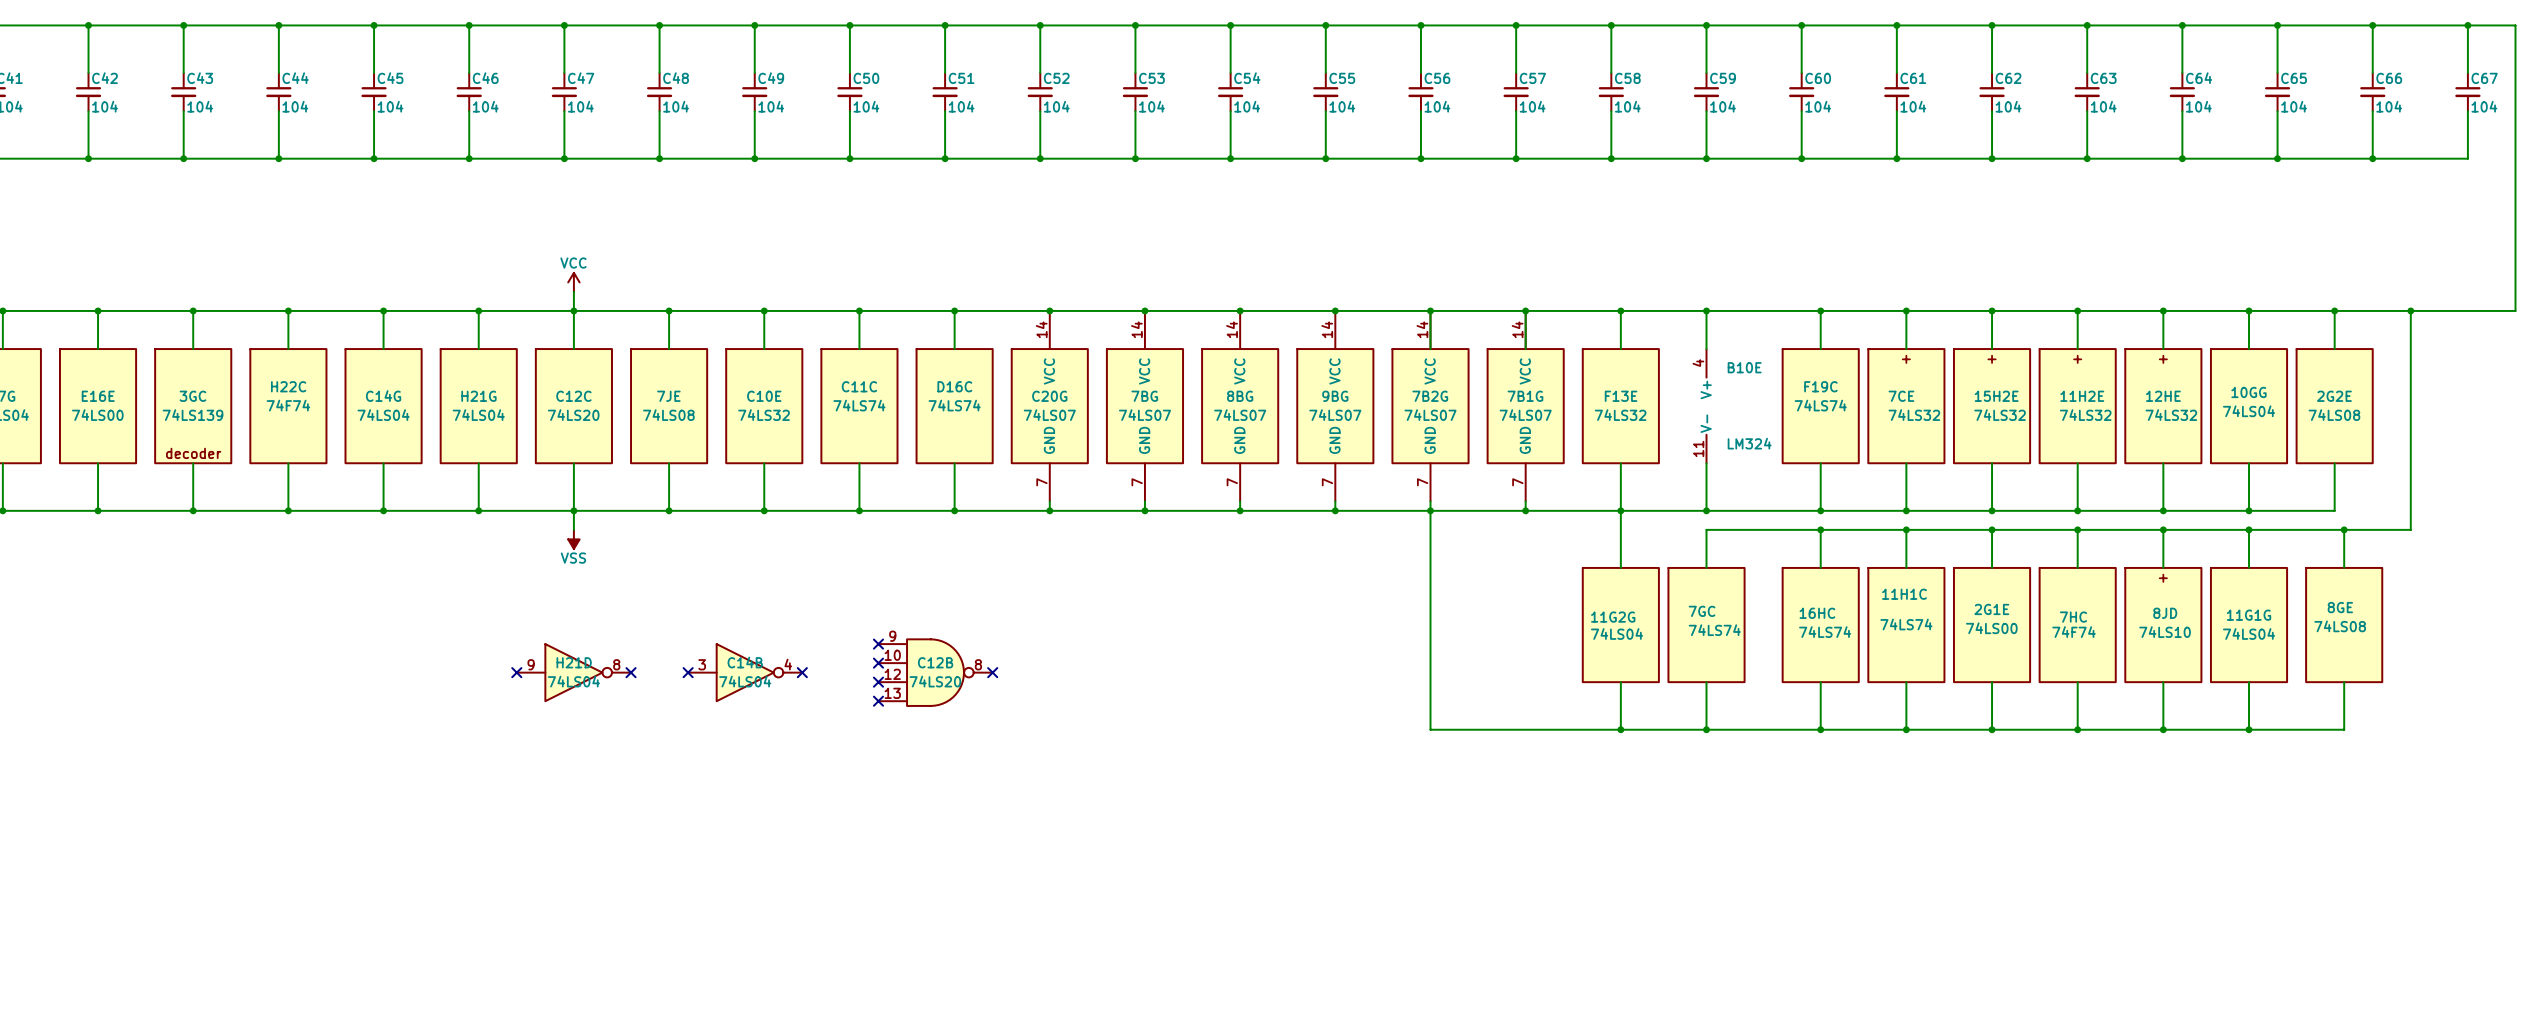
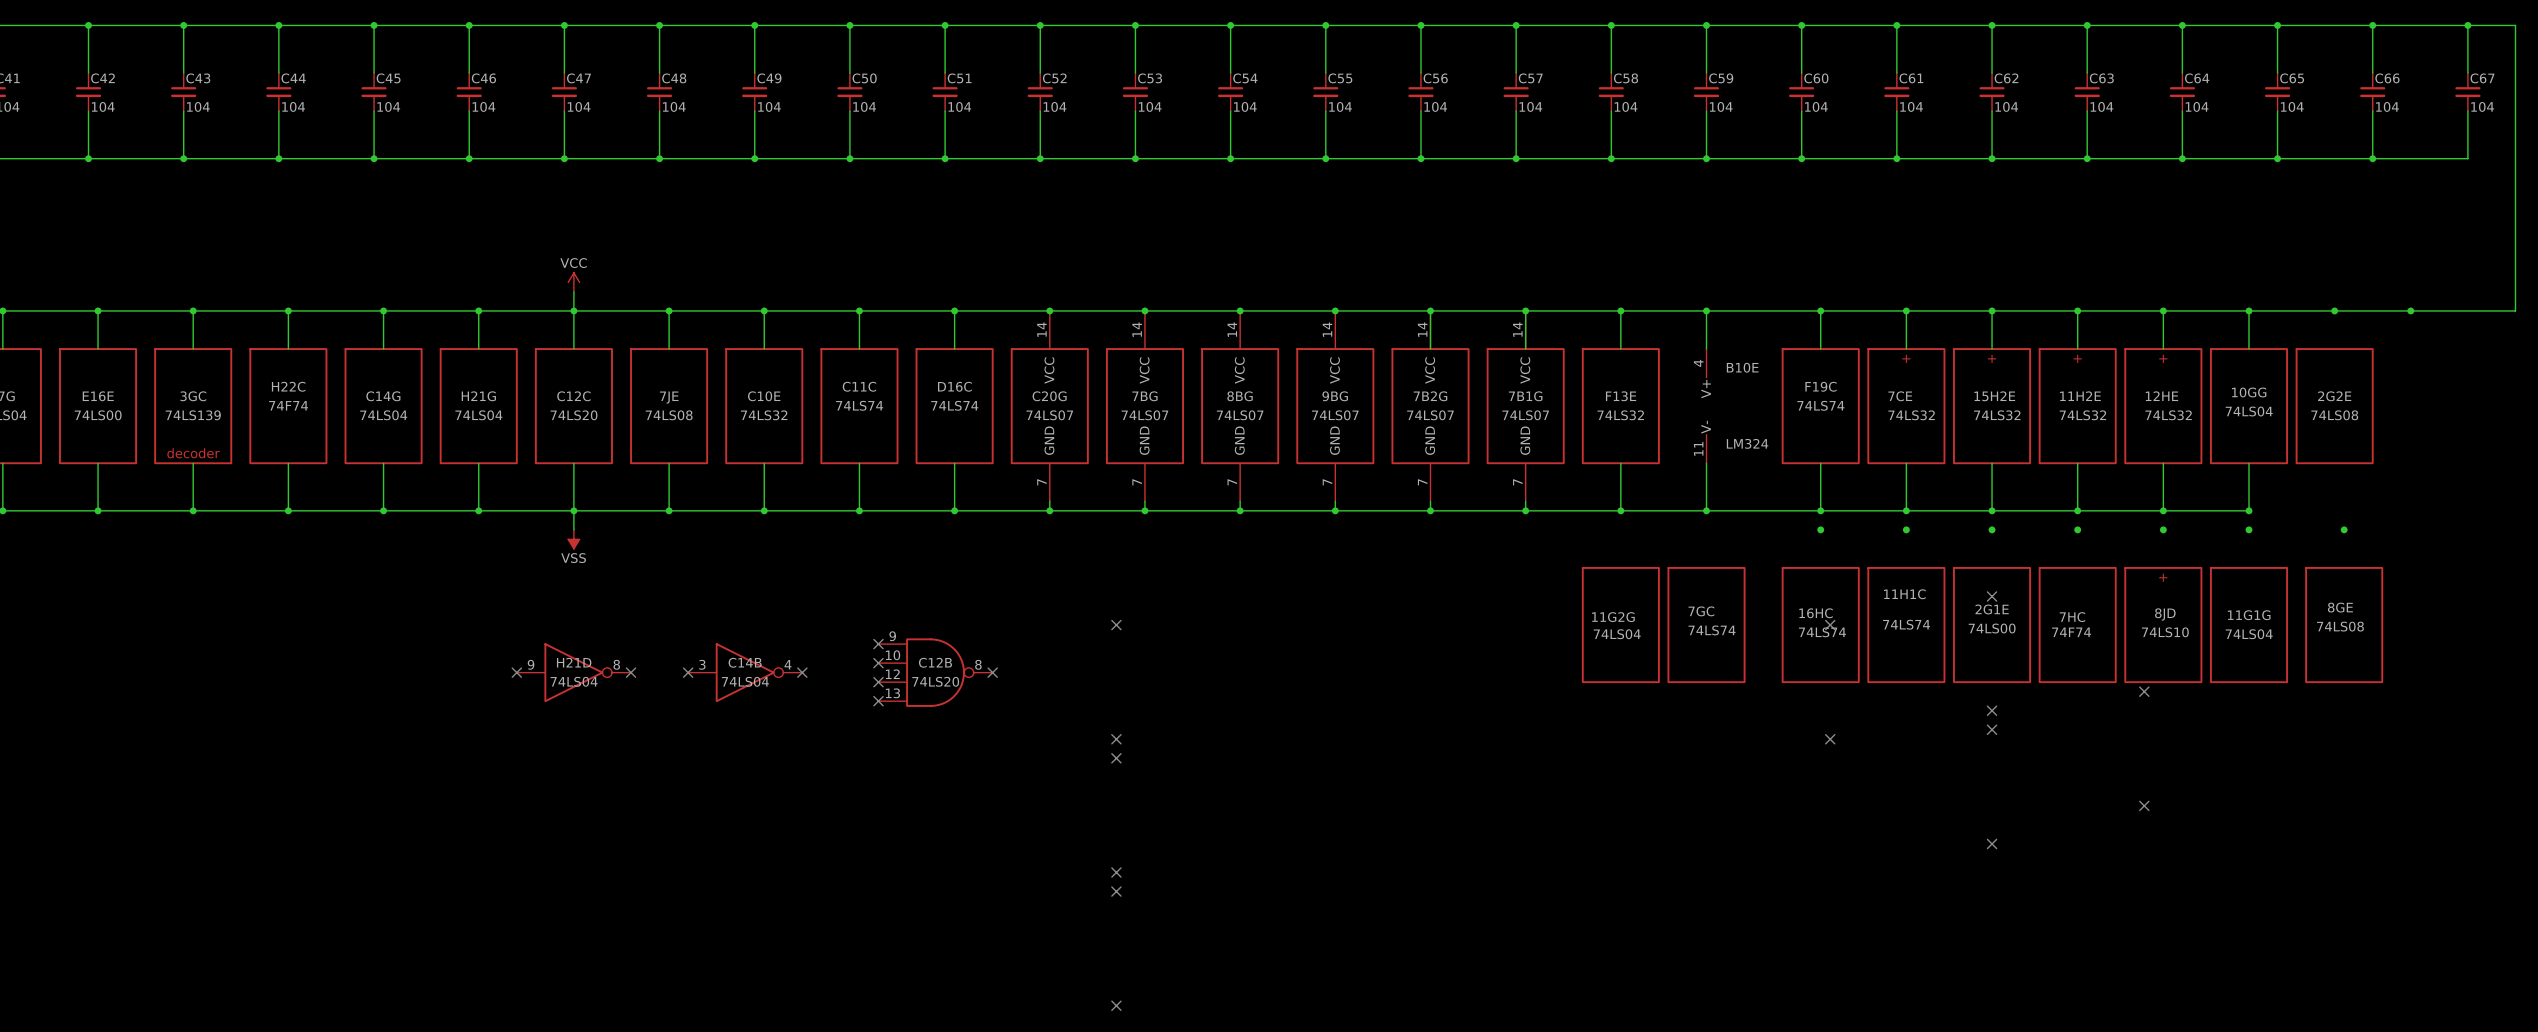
wire: (2334, 310) (2334, 349) -> none
wire: (2410, 310) (2410, 529) (1706, 529) (1706, 567) -> none
wire: (2334, 463) (2334, 510) (2249, 510) -> none
wire: (1430, 510) (1430, 729) (2344, 729) (2344, 682) -> none
wire: (1620, 510) (1620, 567) -> none
wire: (1820, 529) (1820, 567) -> none
wire: (1906, 529) (1906, 567) -> none
wire: (1992, 529) (1992, 567) -> none
wire: (2077, 529) (2077, 567) -> none
wire: (2163, 529) (2163, 567) -> none
wire: (2249, 529) (2249, 567) -> none
wire: (2344, 529) (2344, 567) -> none
no-connect mark: none -> (1992, 596)
no-connect mark: none -> (1116, 625)
no-connect mark: none -> (1830, 625)
wire: (1620, 682) (1620, 729) -> none
wire: (1706, 682) (1706, 729) -> none
wire: (1820, 682) (1820, 729) -> none
wire: (1906, 682) (1906, 729) -> none
wire: (1992, 682) (1992, 729) -> none
wire: (2077, 682) (2077, 729) -> none
wire: (2163, 682) (2163, 729) -> none
wire: (2249, 682) (2249, 729) -> none
no-connect mark: none -> (2144, 691)
no-connect mark: none -> (1992, 710)
junction: (1620, 729) -> none
junction: (1706, 729) -> none
junction: (1820, 729) -> none
junction: (1906, 729) -> none
junction: (1992, 729) -> none
no-connect mark: none -> (1992, 729)
junction: (2077, 729) -> none
junction: (2163, 729) -> none
junction: (2249, 729) -> none
no-connect mark: none -> (1116, 739)
no-connect mark: none -> (1830, 739)
no-connect mark: none -> (1116, 758)
no-connect mark: none -> (2144, 805)
no-connect mark: none -> (1992, 843)
no-connect mark: none -> (1116, 872)
no-connect mark: none -> (1116, 891)
no-connect mark: none -> (1116, 1005)

